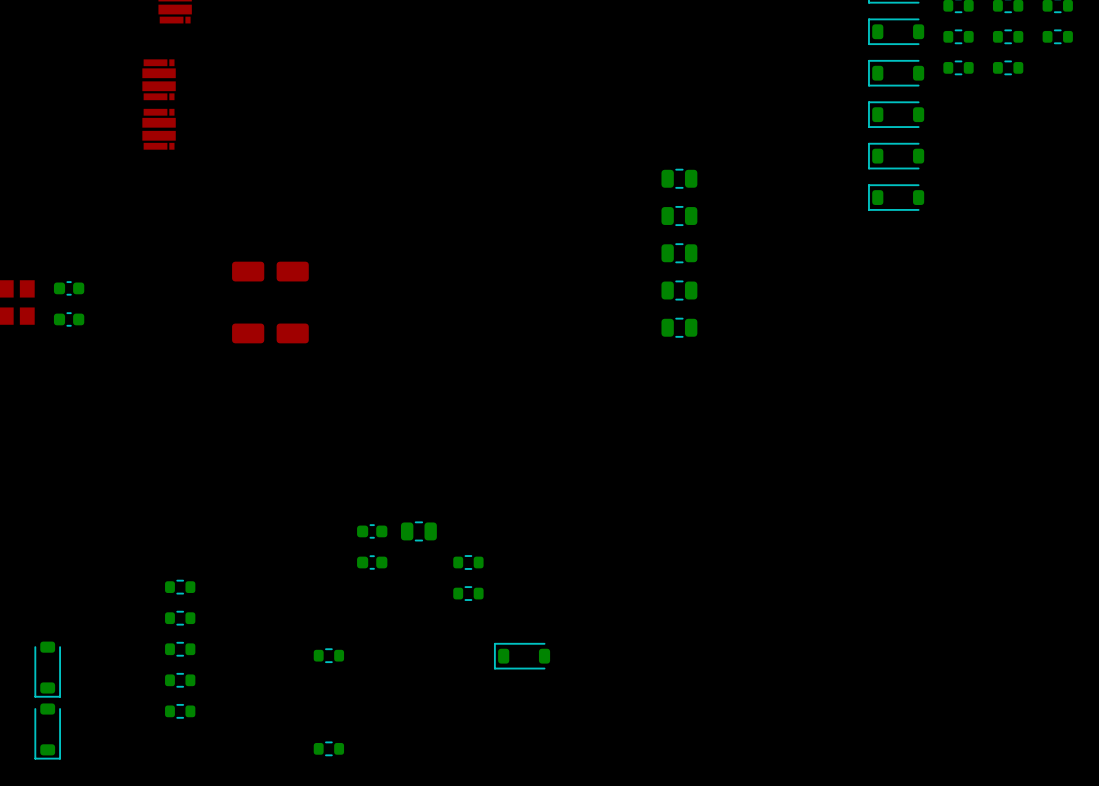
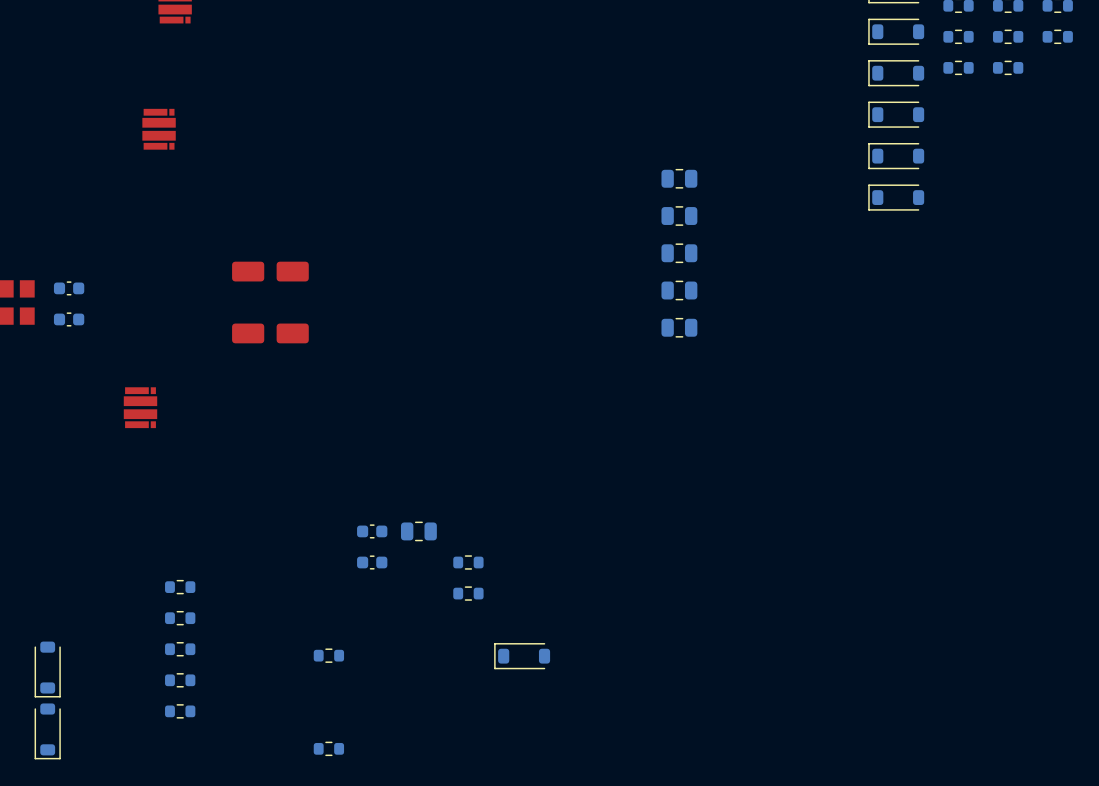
part: (159, 79) -> none
part: none -> (140, 407)

